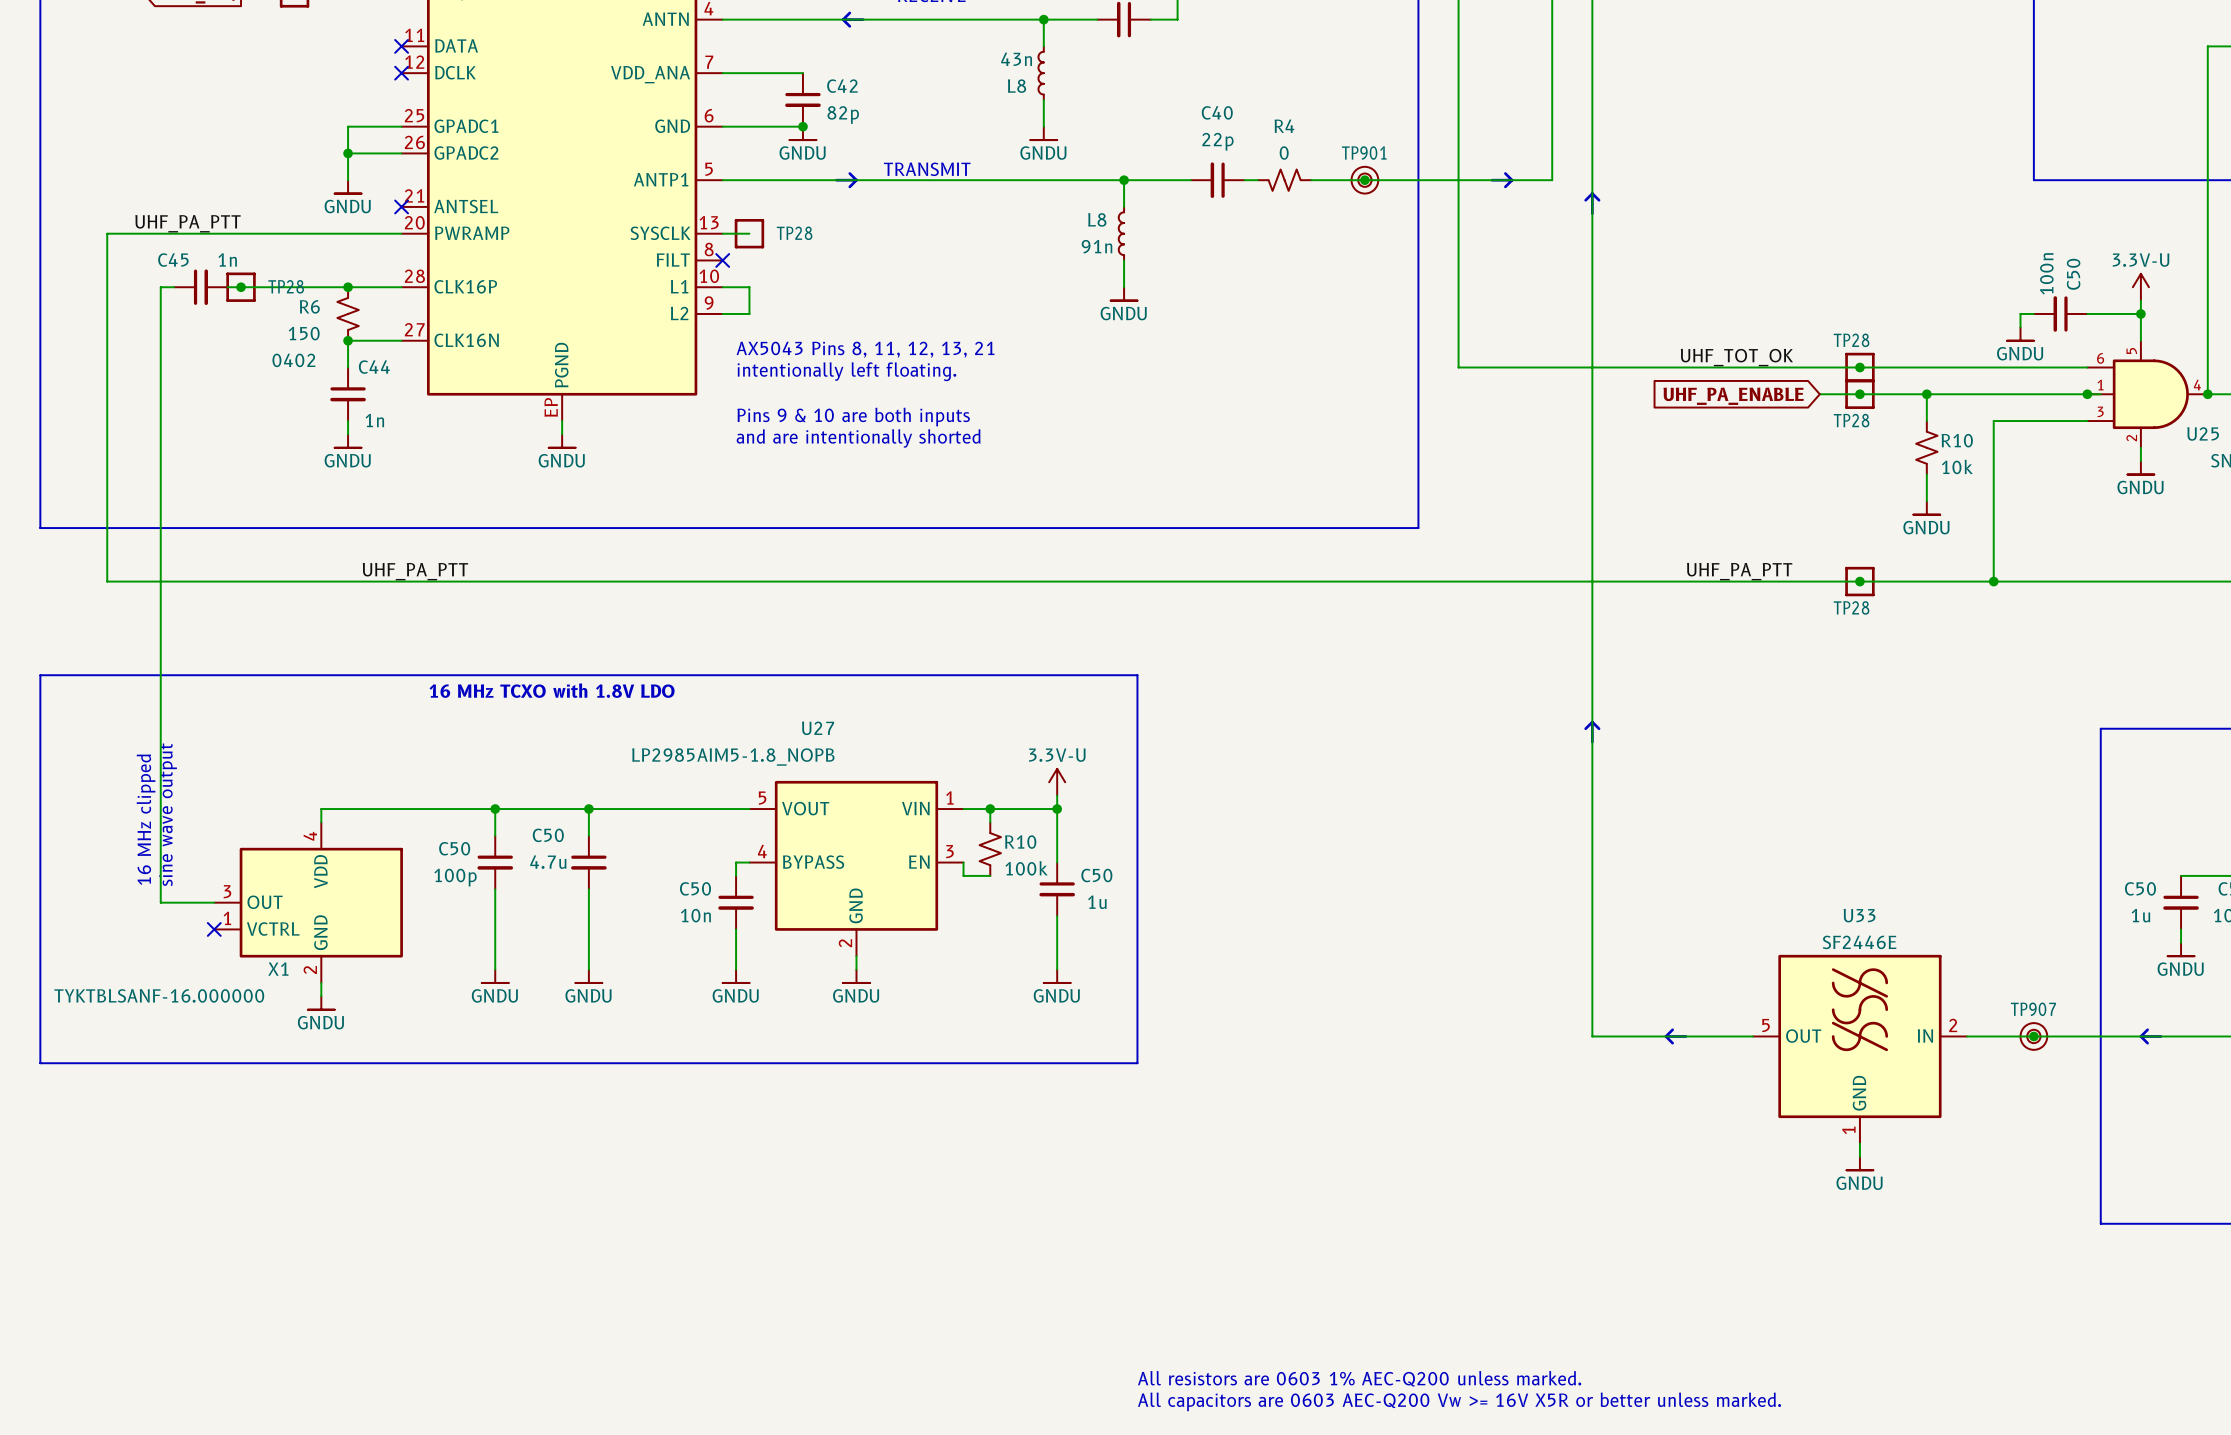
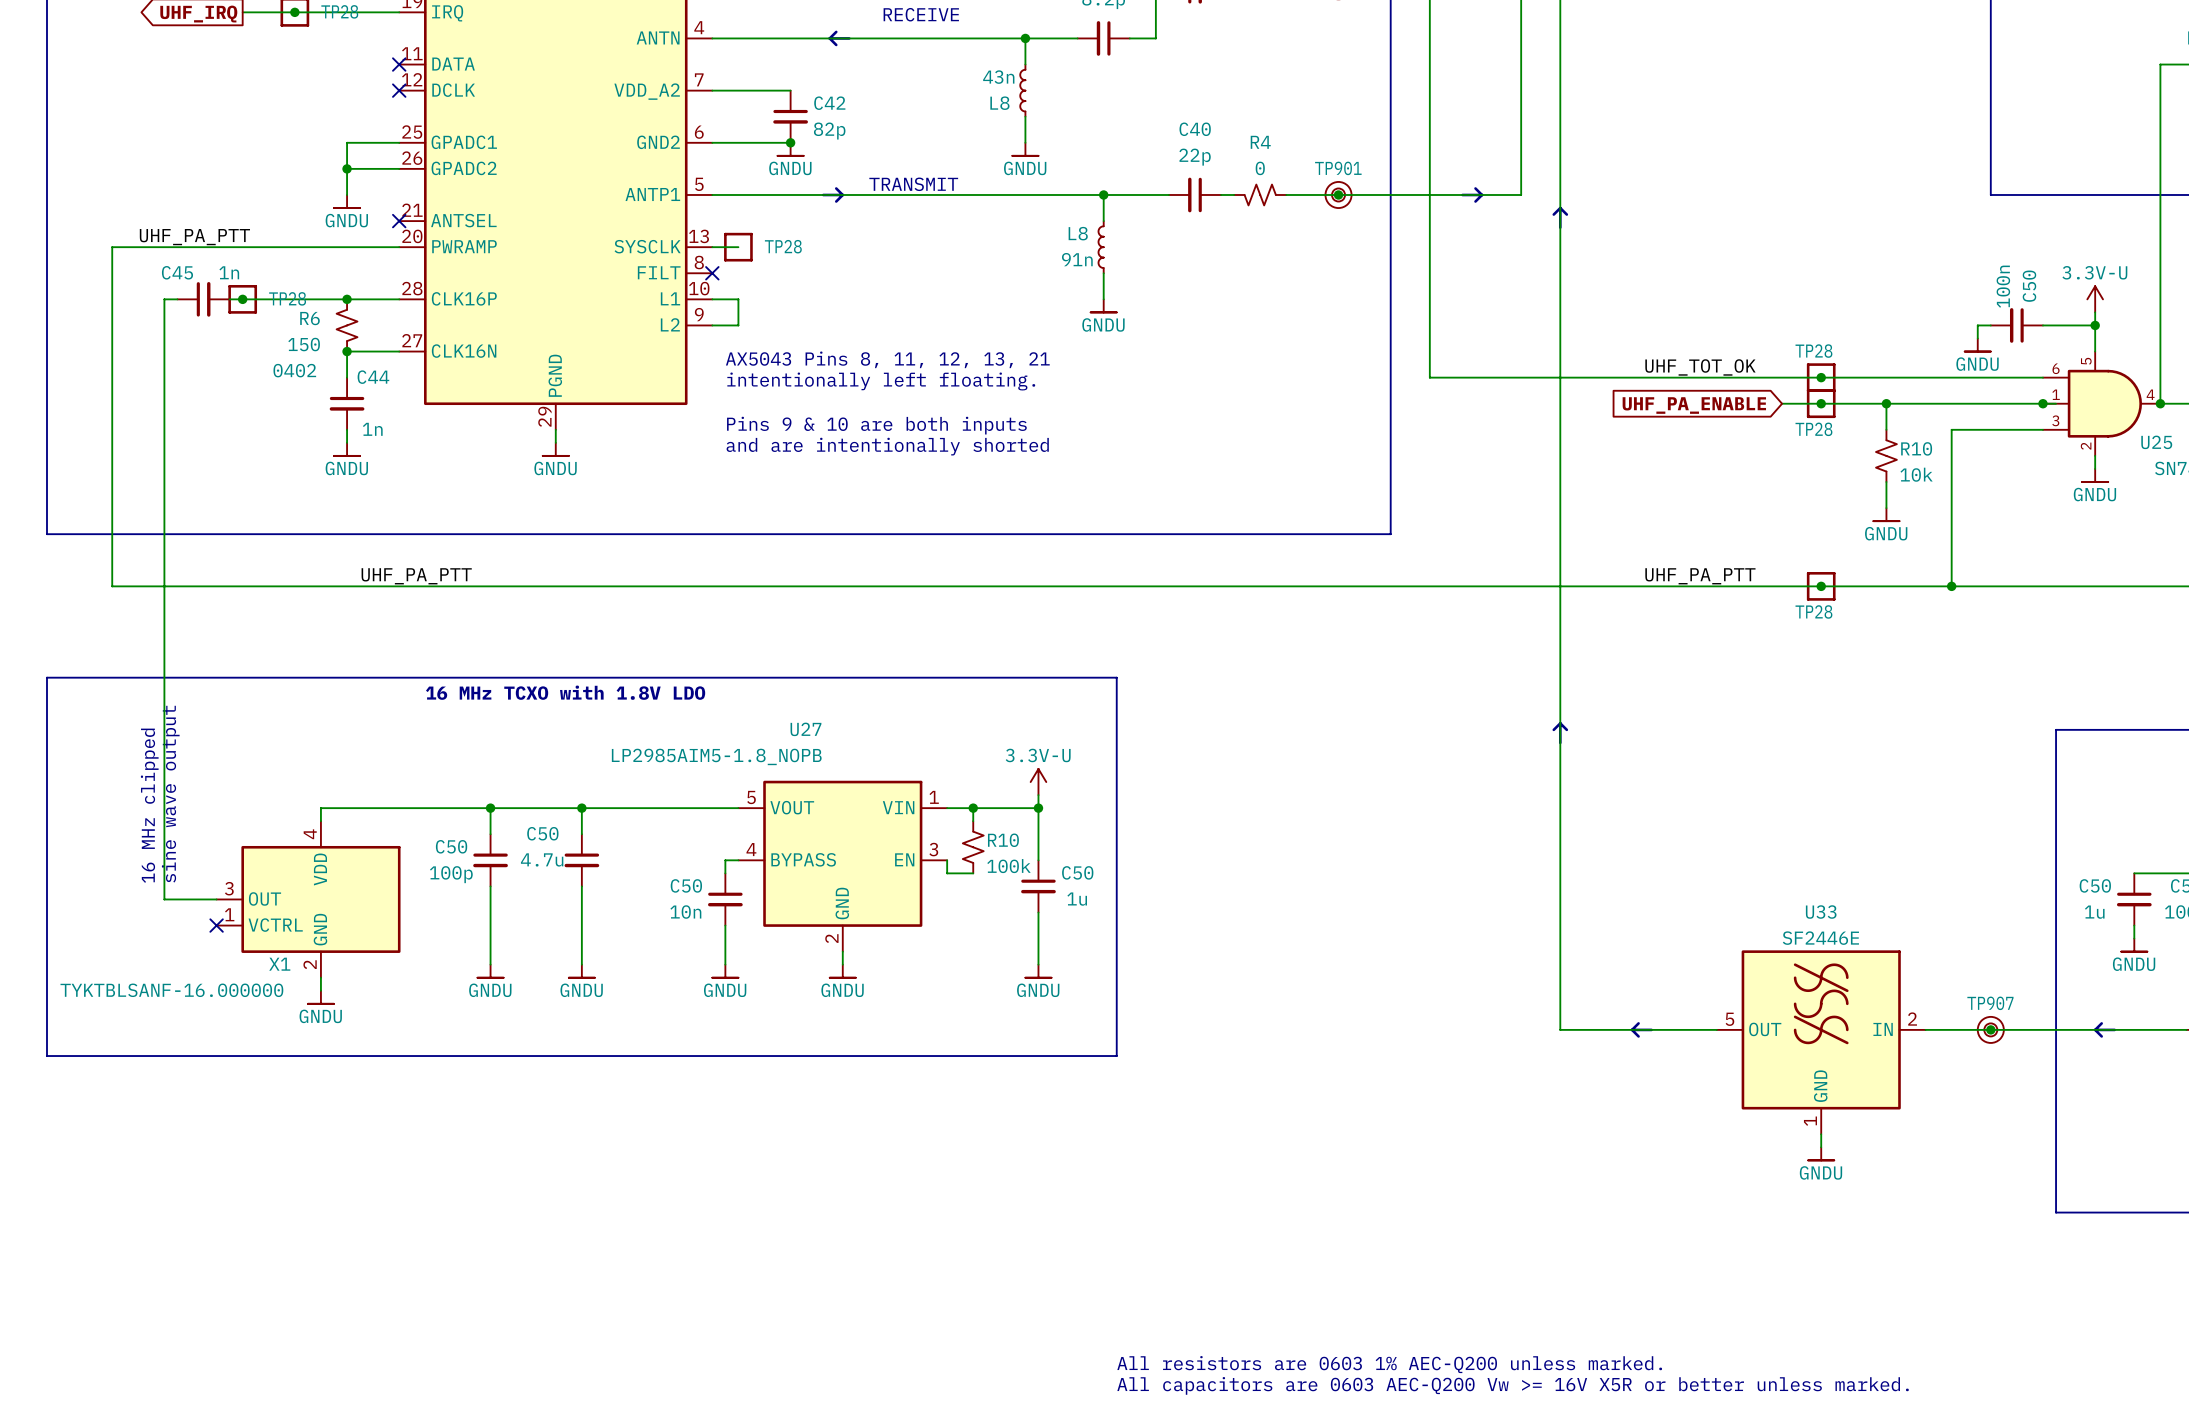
part pin name: VDD_ANA (650, 74) -> VDD_A2 (647, 91)
part pin name: GND (672, 126) -> GND2 (658, 142)
part pin number: EP (551, 407) -> 29 (544, 416)

